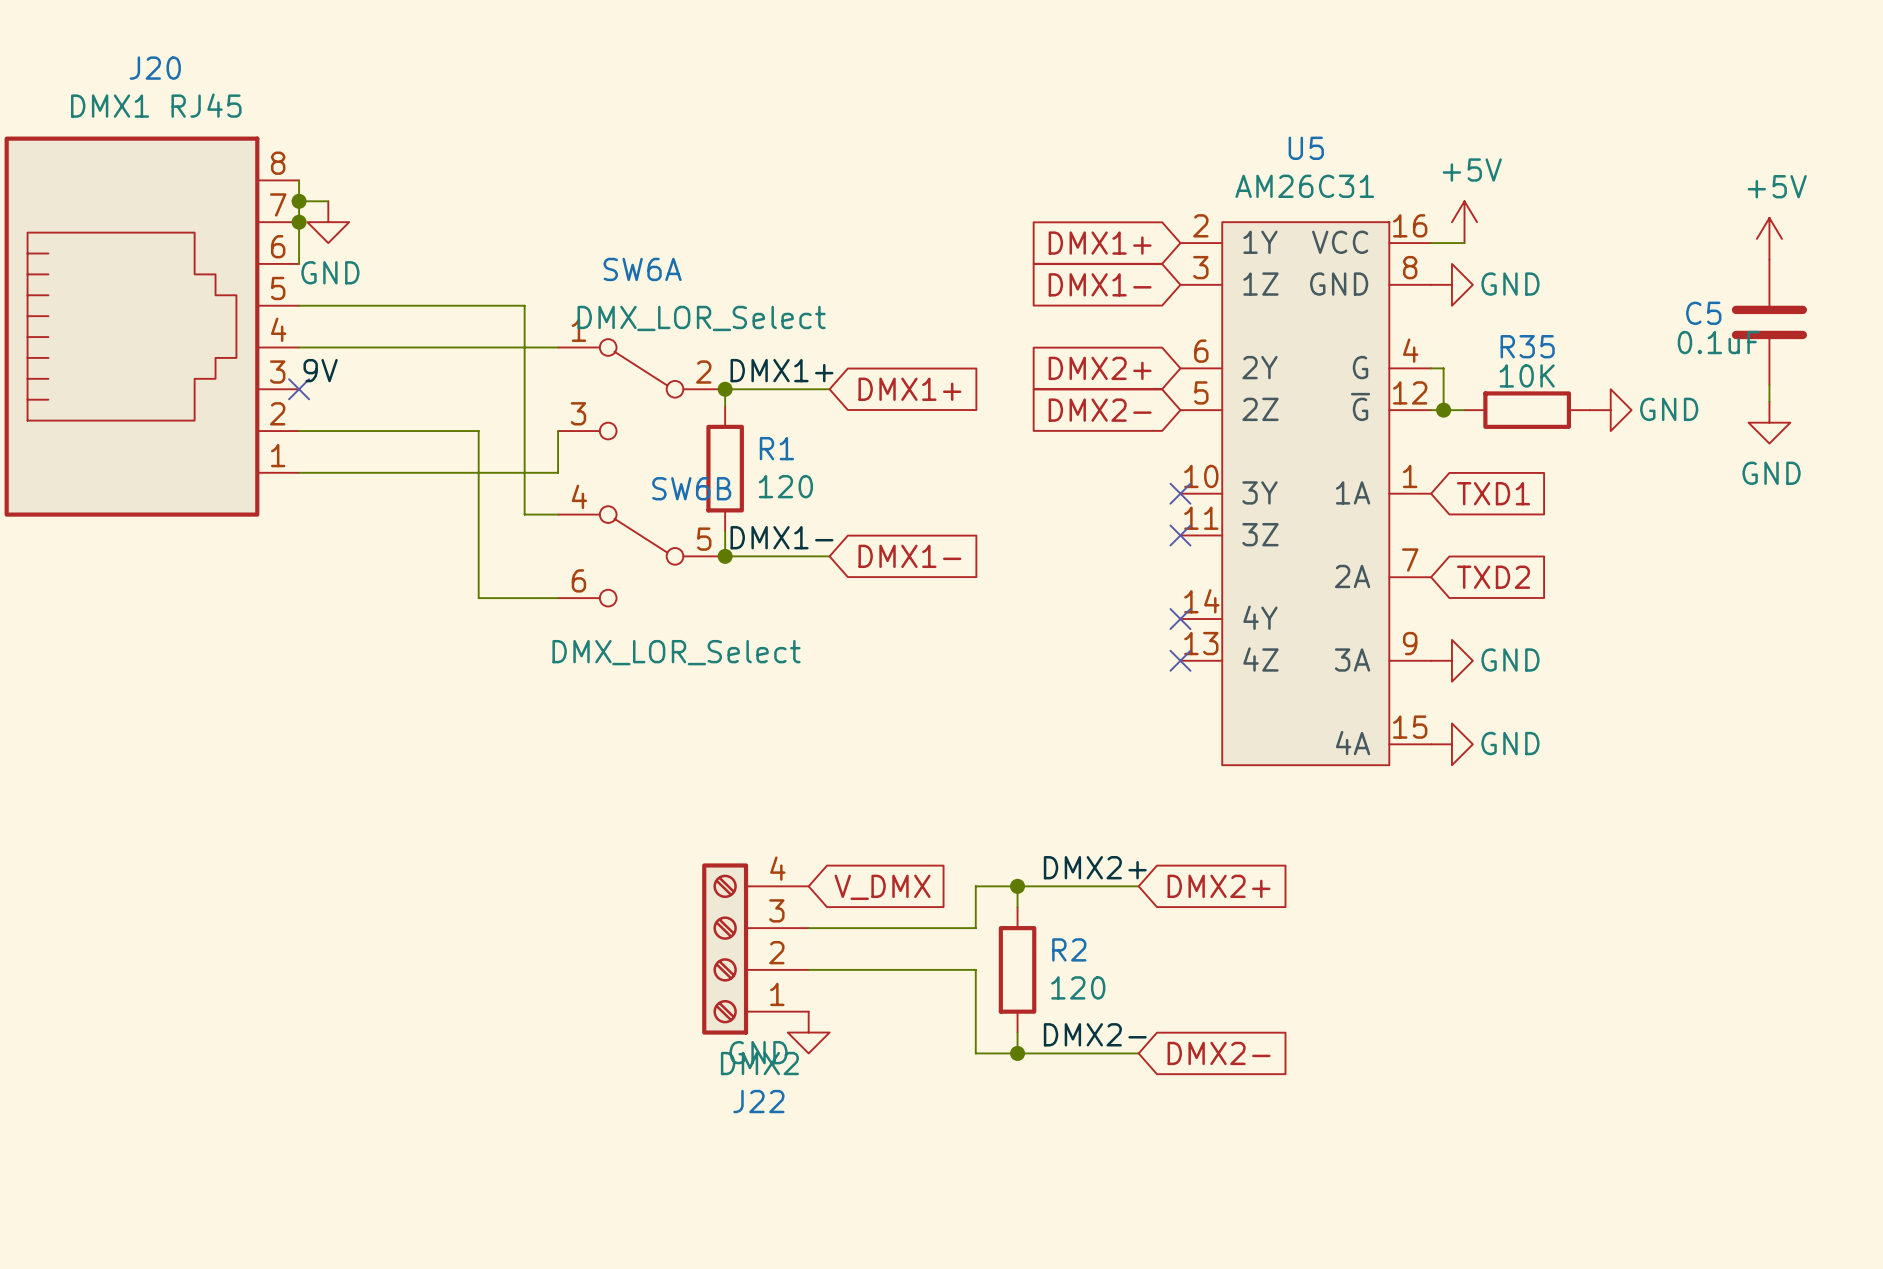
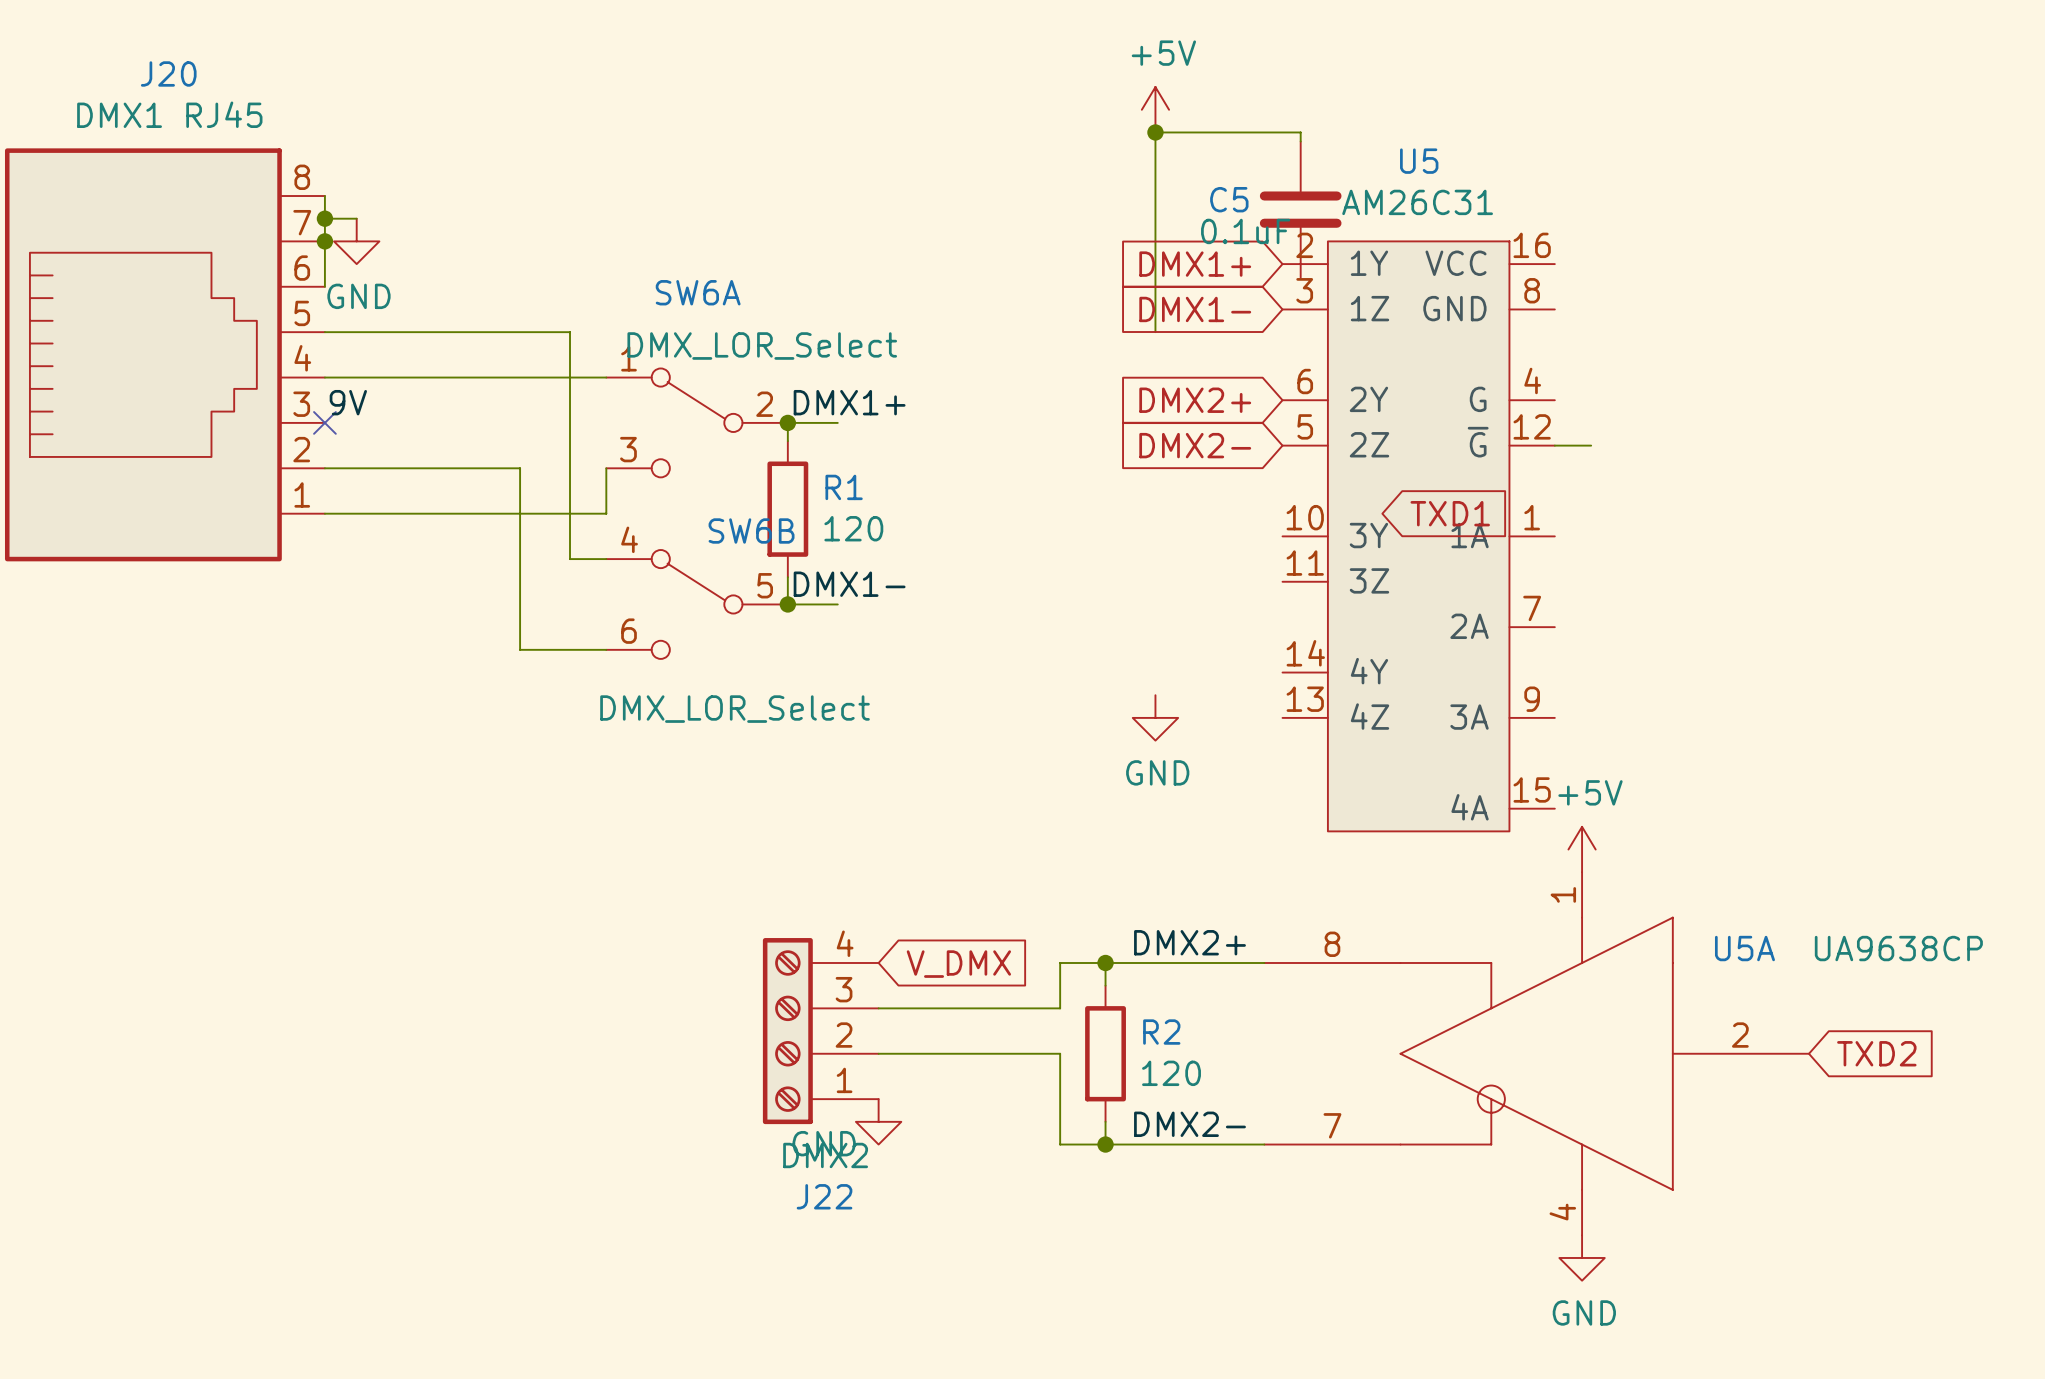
power symbol: none -> +5V (1155, 109)
junction: none -> (1155, 132)
wire: none -> (1300, 141) (1300, 132) (1155, 132) (1155, 332)
power symbol: +5V (1464, 222) -> none
power symbol: +5V (1769, 238) -> none
wire: (1431, 243) (1464, 243) -> none
power symbol: GND (1451, 284) -> none
C5 position: (1769, 322) -> (1300, 209)
wire: (1431, 368) (1443, 368) (1443, 410) -> none
wire: (1769, 385) (1769, 401) -> none
wire: (771, 389) (829, 389) -> none
global label: DMX1+ (909, 389) -> none
junction: (1443, 410) -> none
R35: 10K (1527, 410) -> none
power symbol: GND (1610, 410) -> none
power symbol: GND (1769, 422) -> none
no-connect mark: (1180, 493) -> none
global label position: TXD1 (1493, 493) -> TXD1 (1450, 513)
no-connect mark: (1180, 535) -> none
wire: (771, 556) (829, 556) -> none
global label: DMX1- (909, 556) -> none
global label: TXD2 (1493, 577) -> none
no-connect mark: (1180, 619) -> none
power symbol: none -> GND (1155, 717)
no-connect mark: (1180, 660) -> none
power symbol: GND (1451, 660) -> none
power symbol: GND (1451, 744) -> none
power symbol: none -> +5V (1582, 849)
wire: none -> (1237, 962) (1264, 962)
global label: DMX2+ (1219, 886) -> none
U5A: none -> UA9638CP (1536, 1053)
global label: none -> TXD2 (1876, 1053)
wire: none -> (1237, 1144) (1264, 1144)
global label: DMX2- (1219, 1053) -> none
power symbol: none -> GND (1582, 1257)

